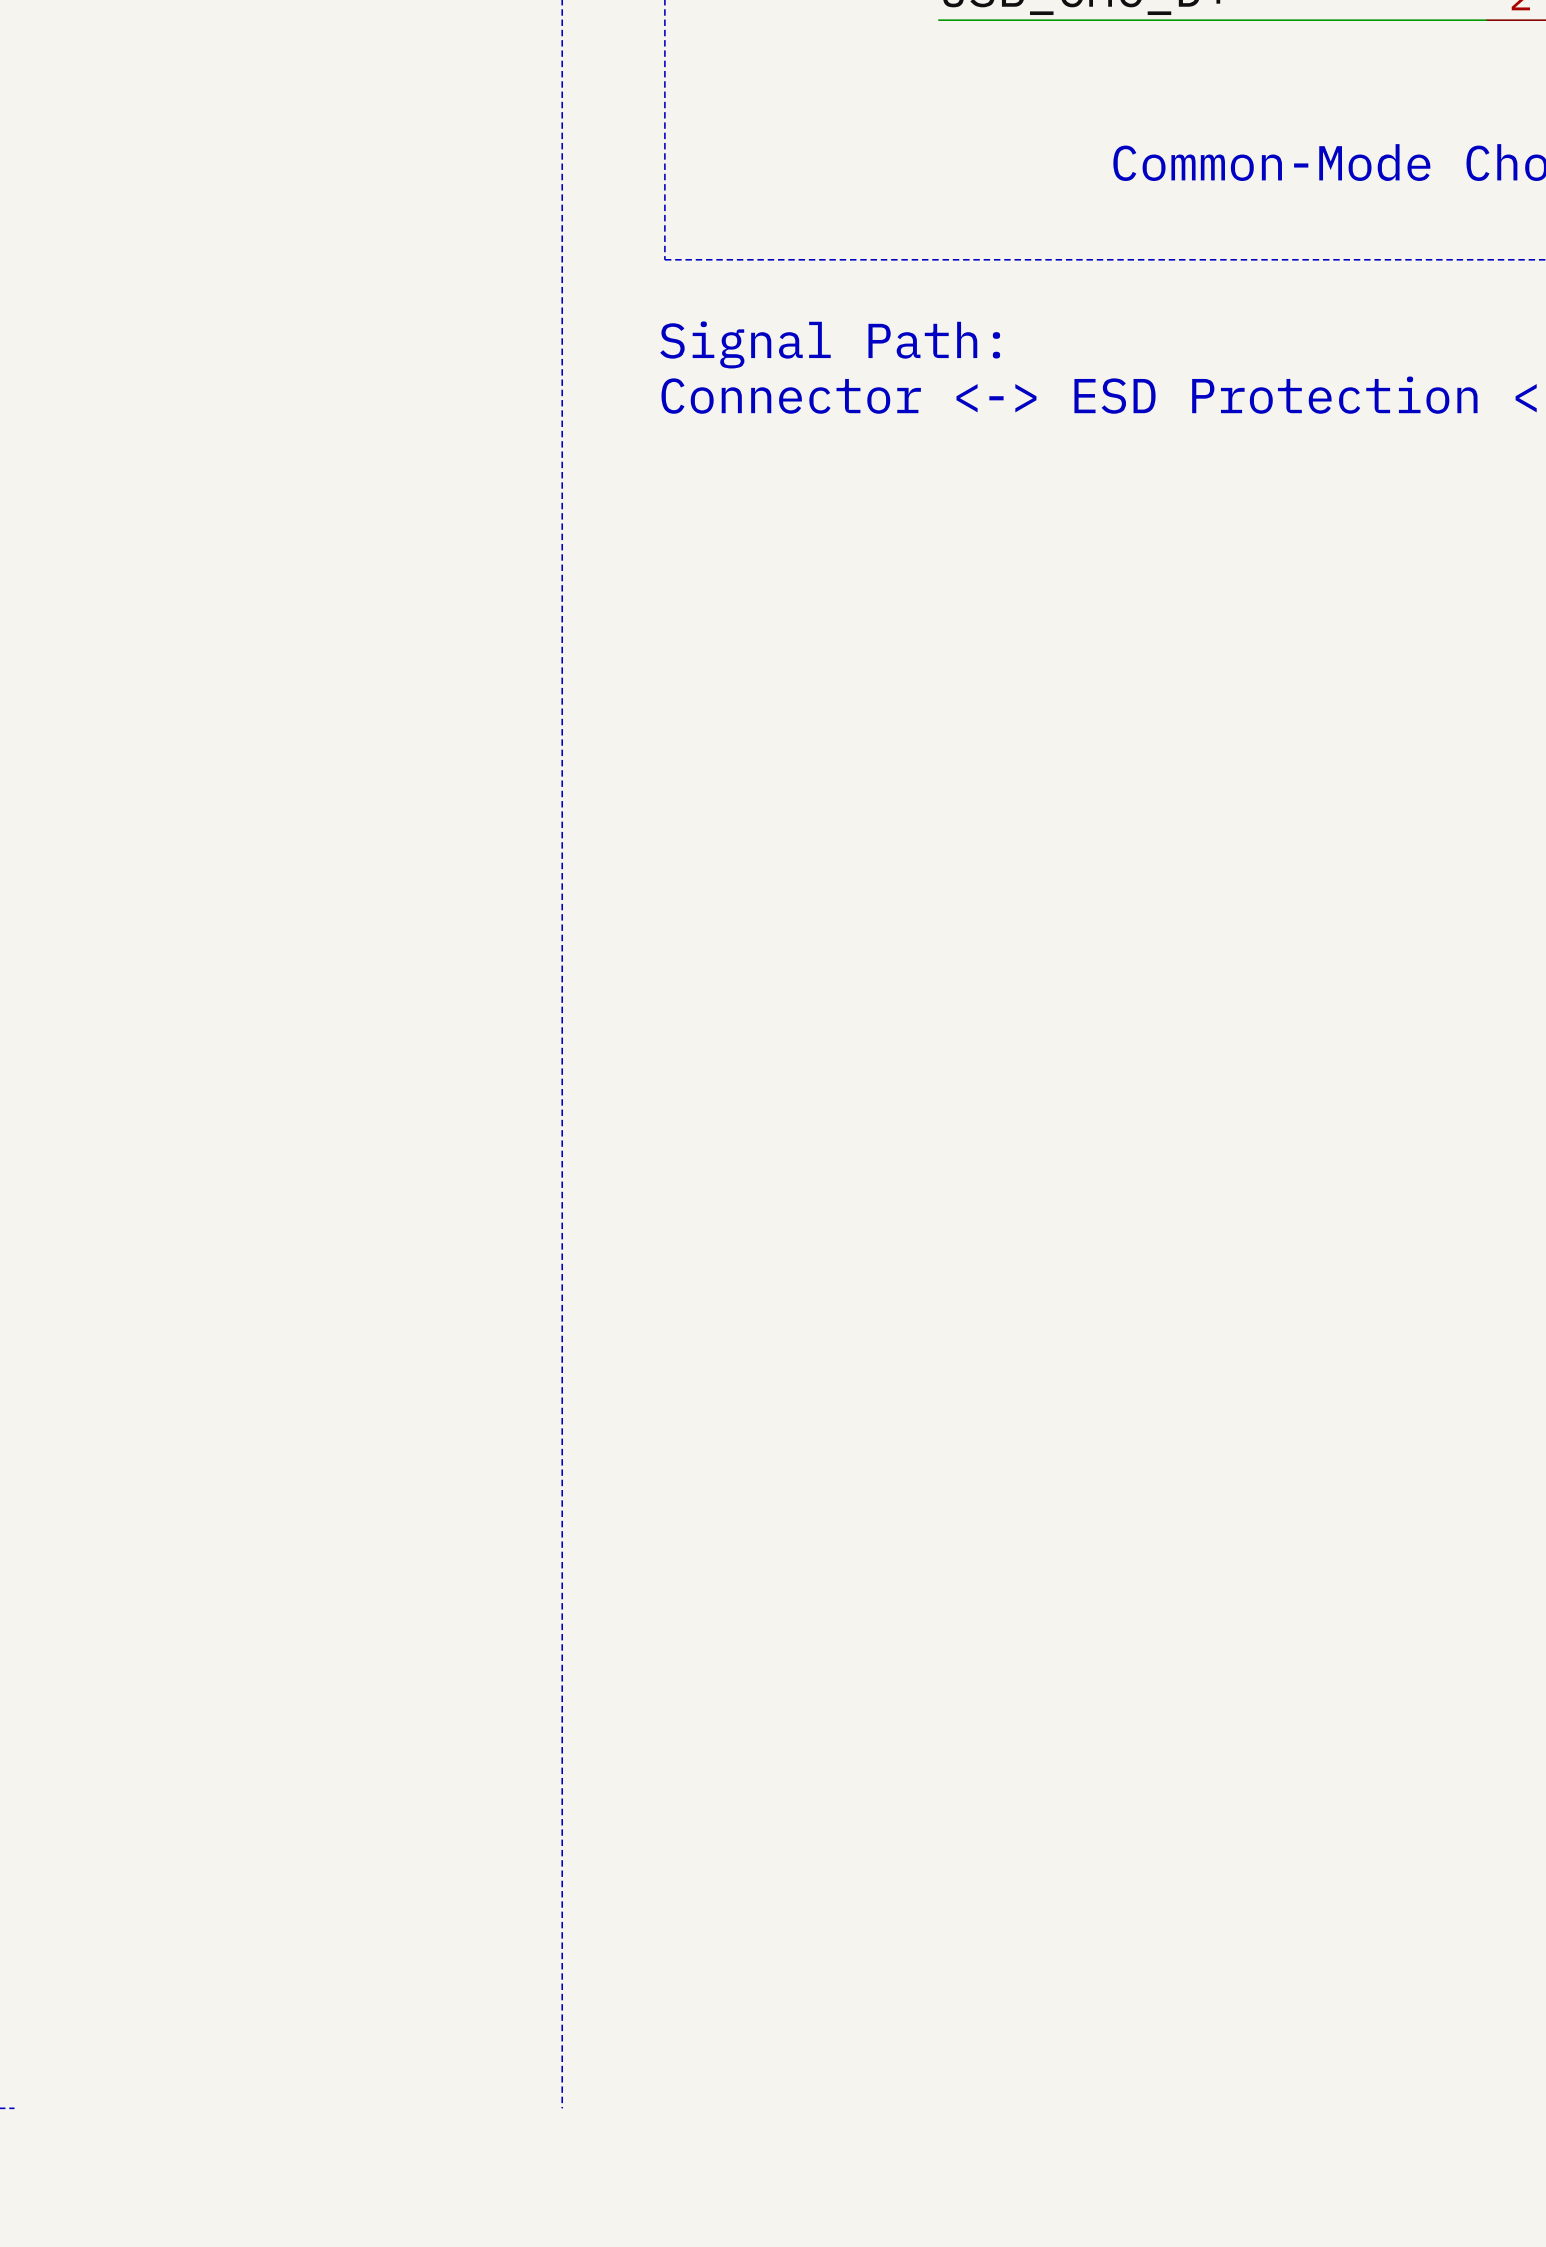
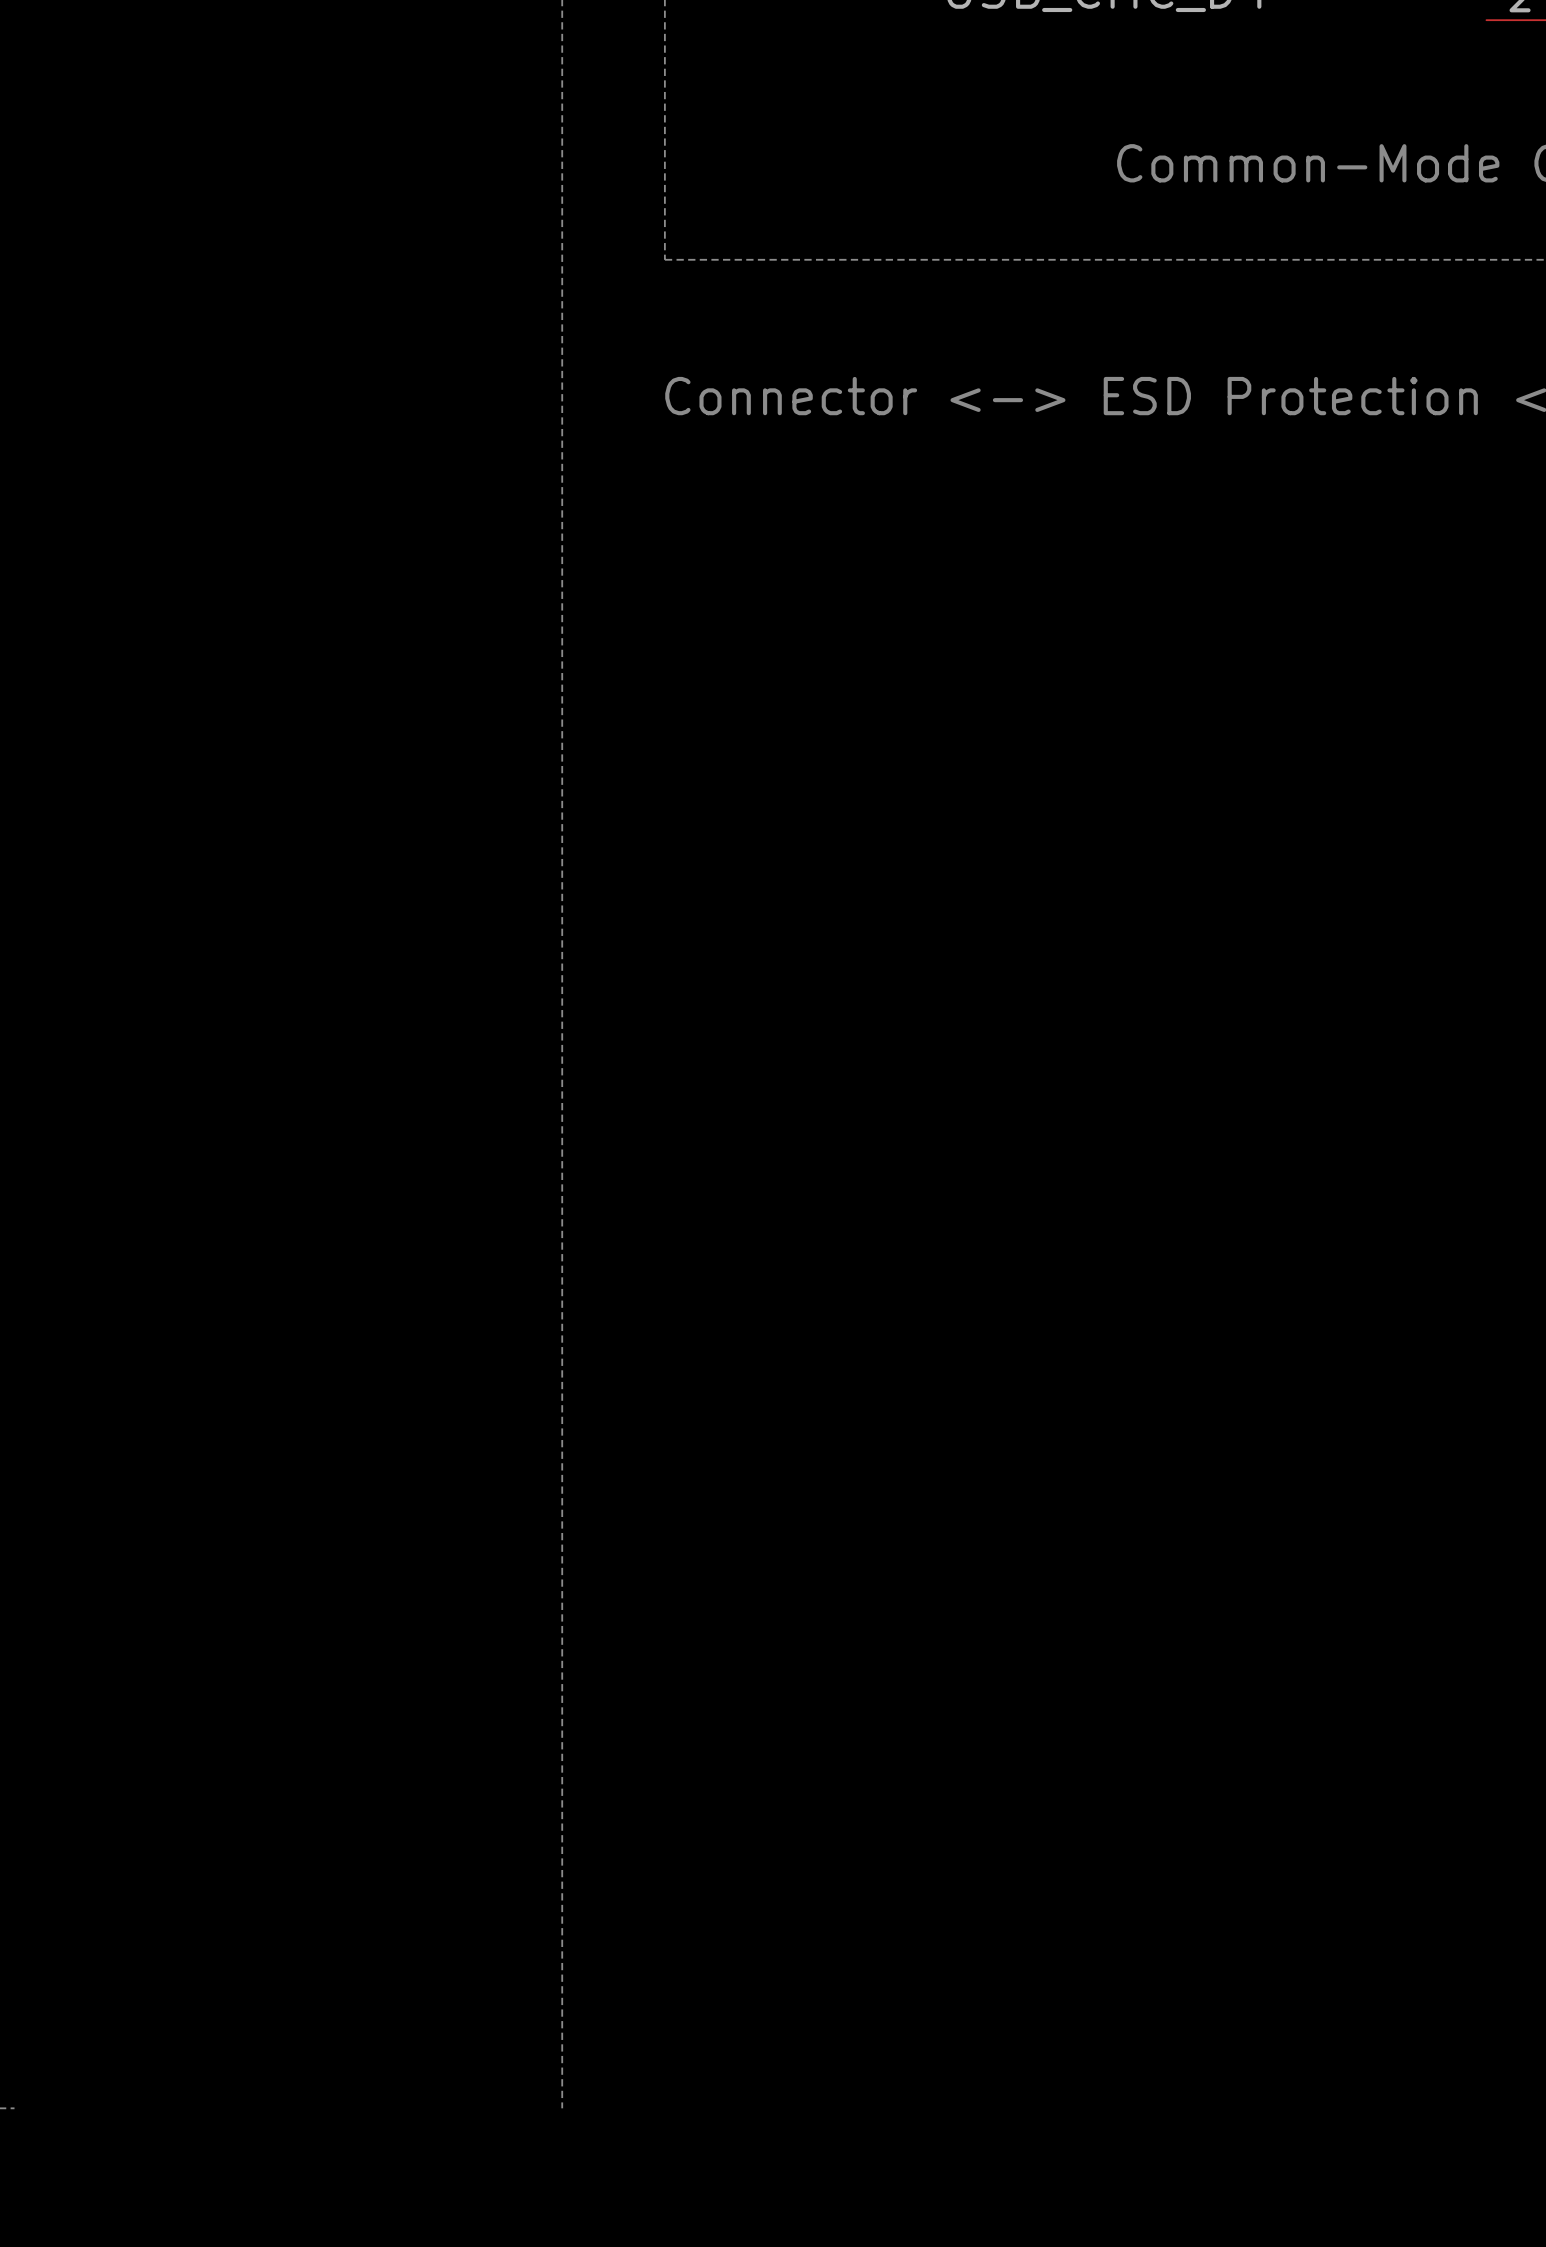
wire: (938, 20) (1486, 20) -> none
text: Signal Path: (830, 344) -> none

